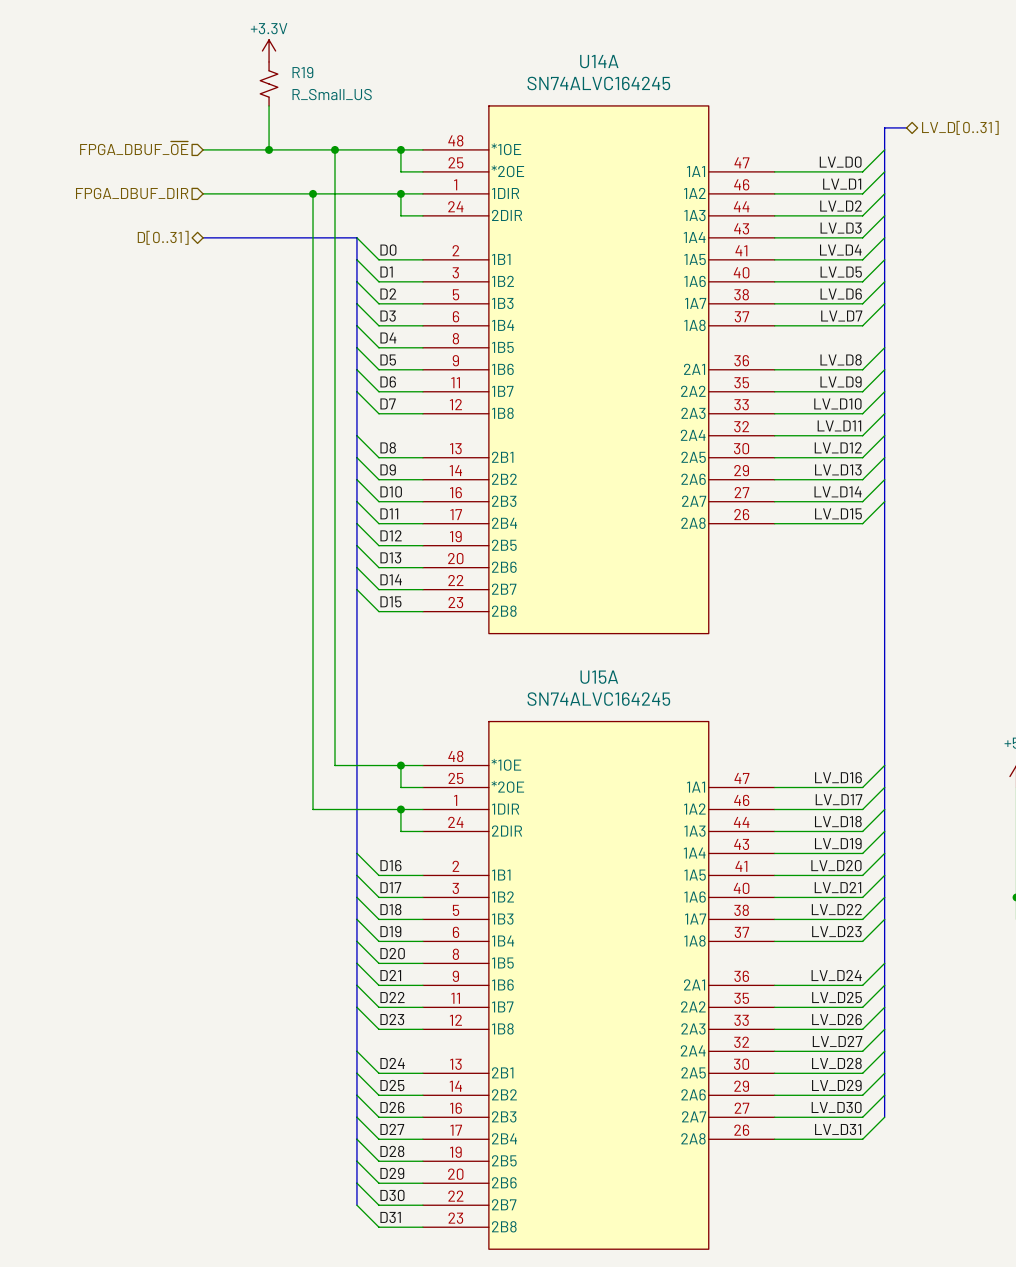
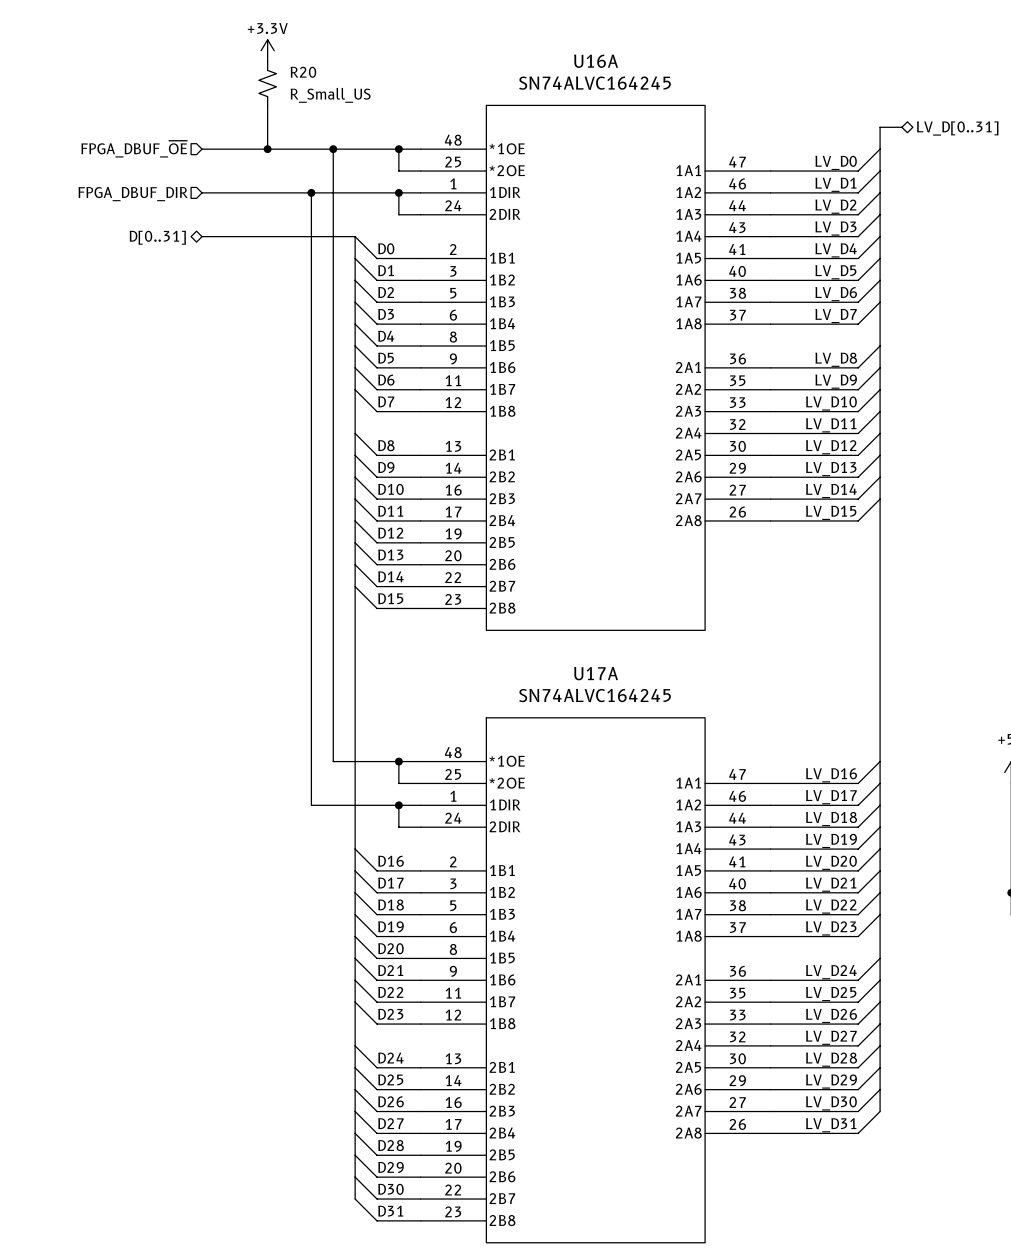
U14A name: U14A (599, 61) -> U16A (596, 61)
R19 name: R19 (302, 72) -> R20 (303, 72)
U15A name: U15A (599, 677) -> U17A (596, 673)

